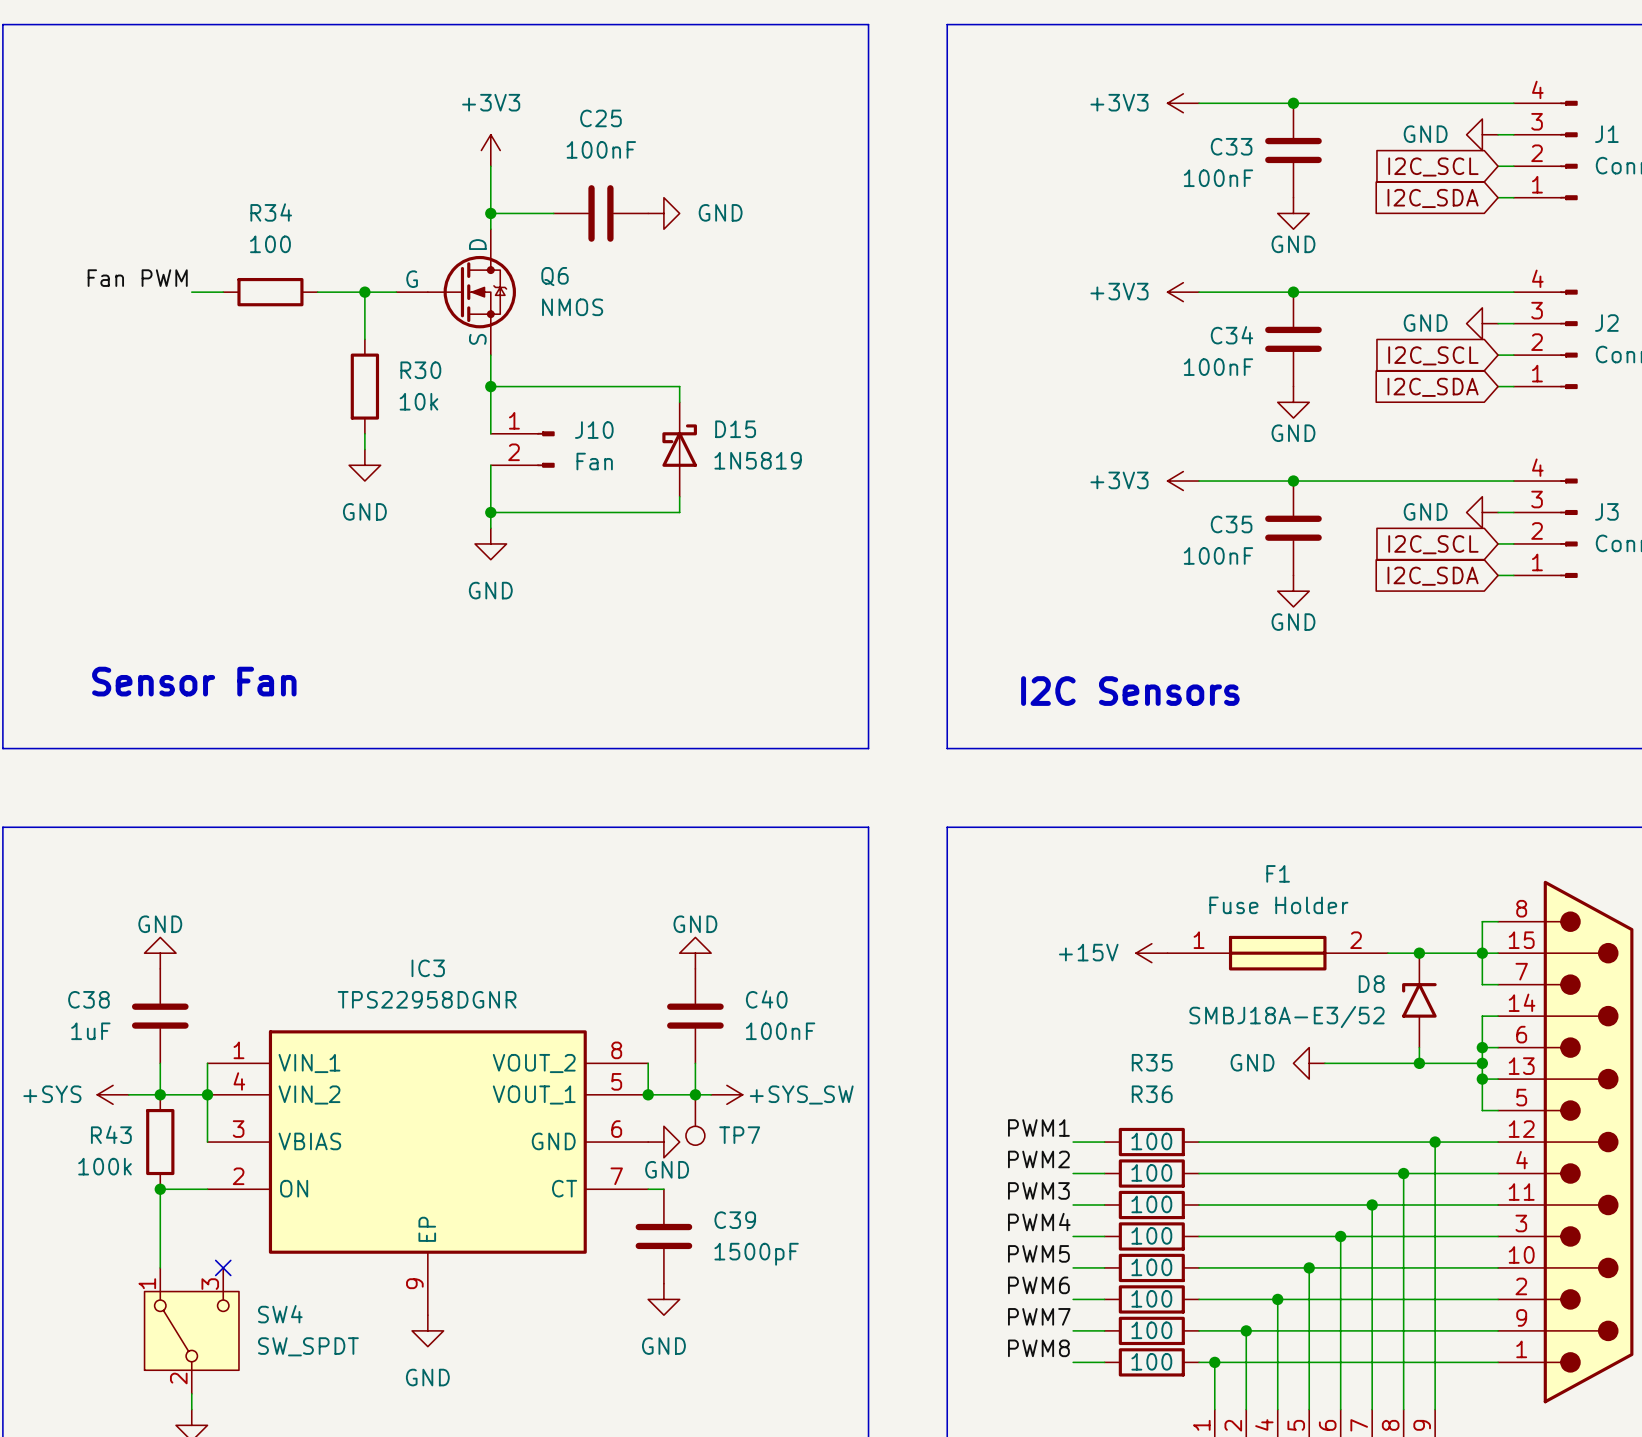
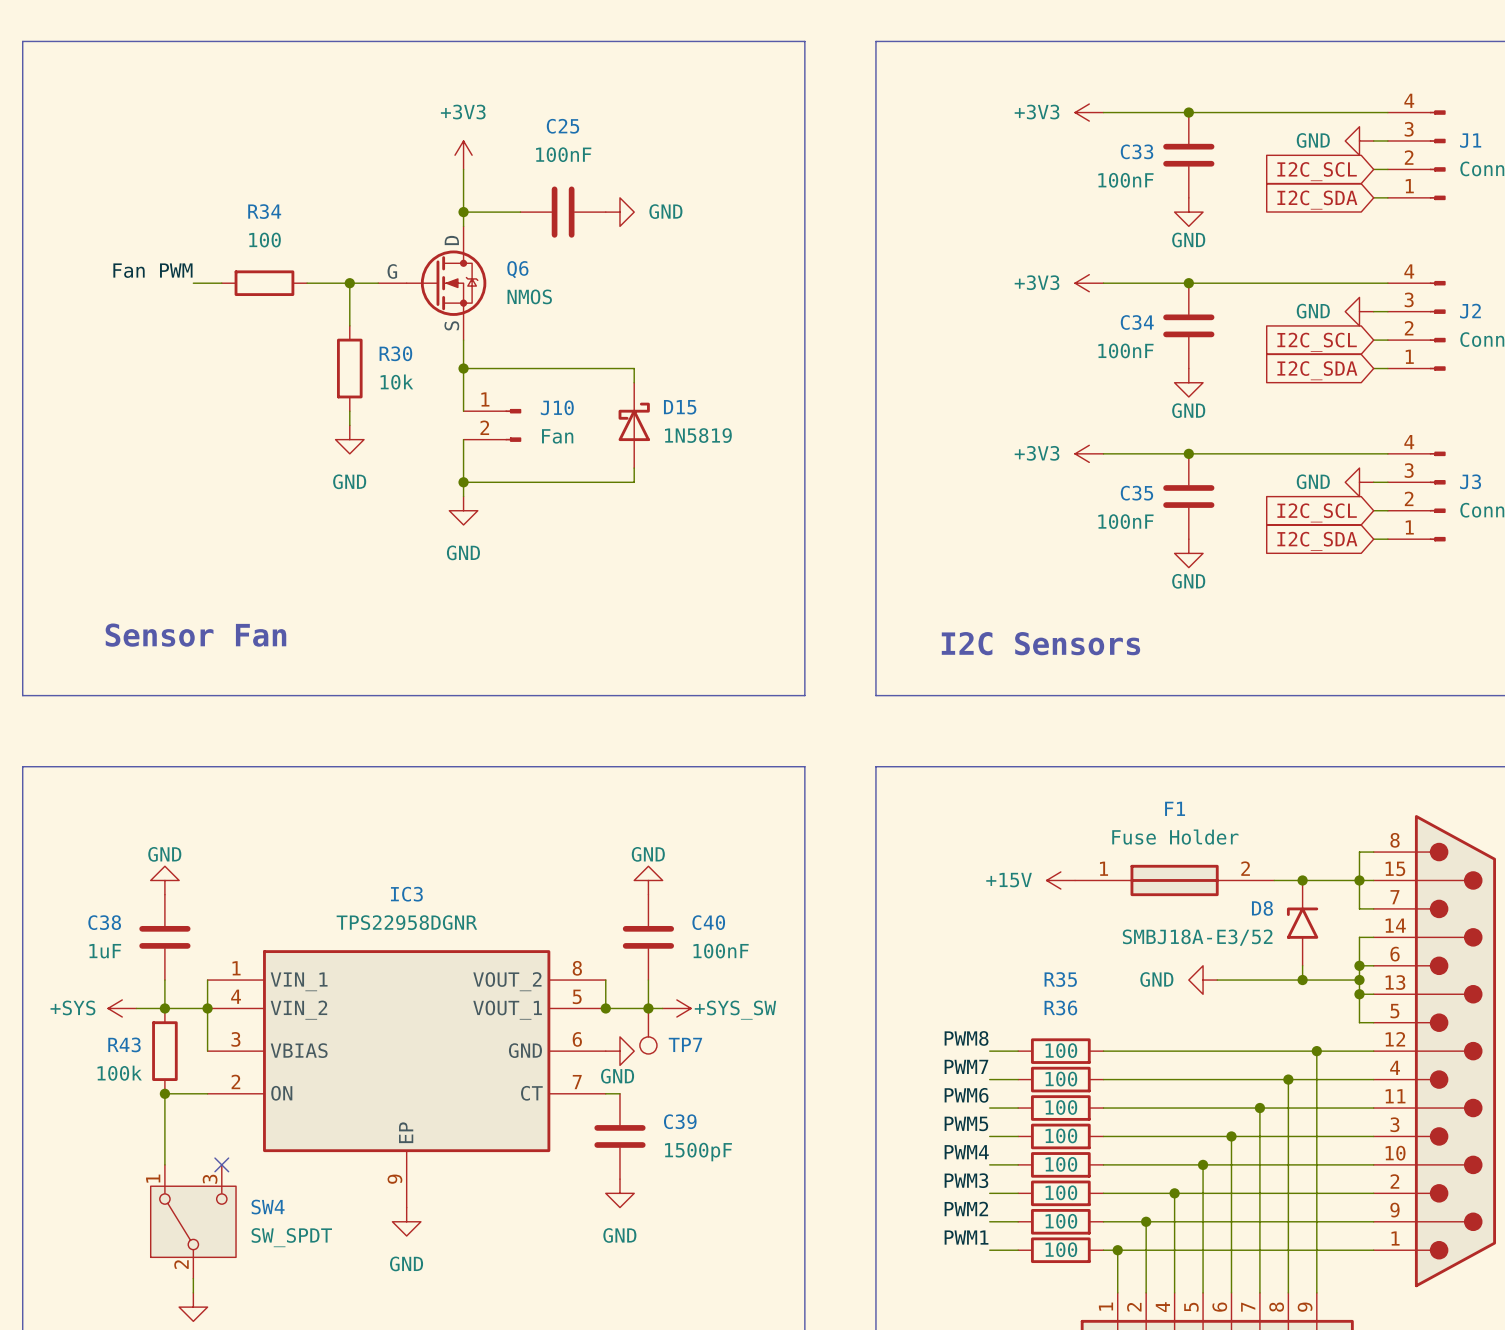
label: PWM1 (1038, 1127) -> PWM8 (966, 1038)
label: PWM2 (1038, 1159) -> PWM7 (966, 1066)
label: PWM3 (1038, 1190) -> PWM6 (966, 1095)
label: PWM4 (1039, 1222) -> PWM5 (966, 1123)
label: PWM5 (1038, 1253) -> PWM4 (966, 1152)
label: PWM6 (1038, 1285) -> PWM3 (966, 1180)
label: PWM7 (1039, 1316) -> PWM2 (966, 1208)
label: PWM8 (1038, 1348) -> PWM1 (966, 1237)

